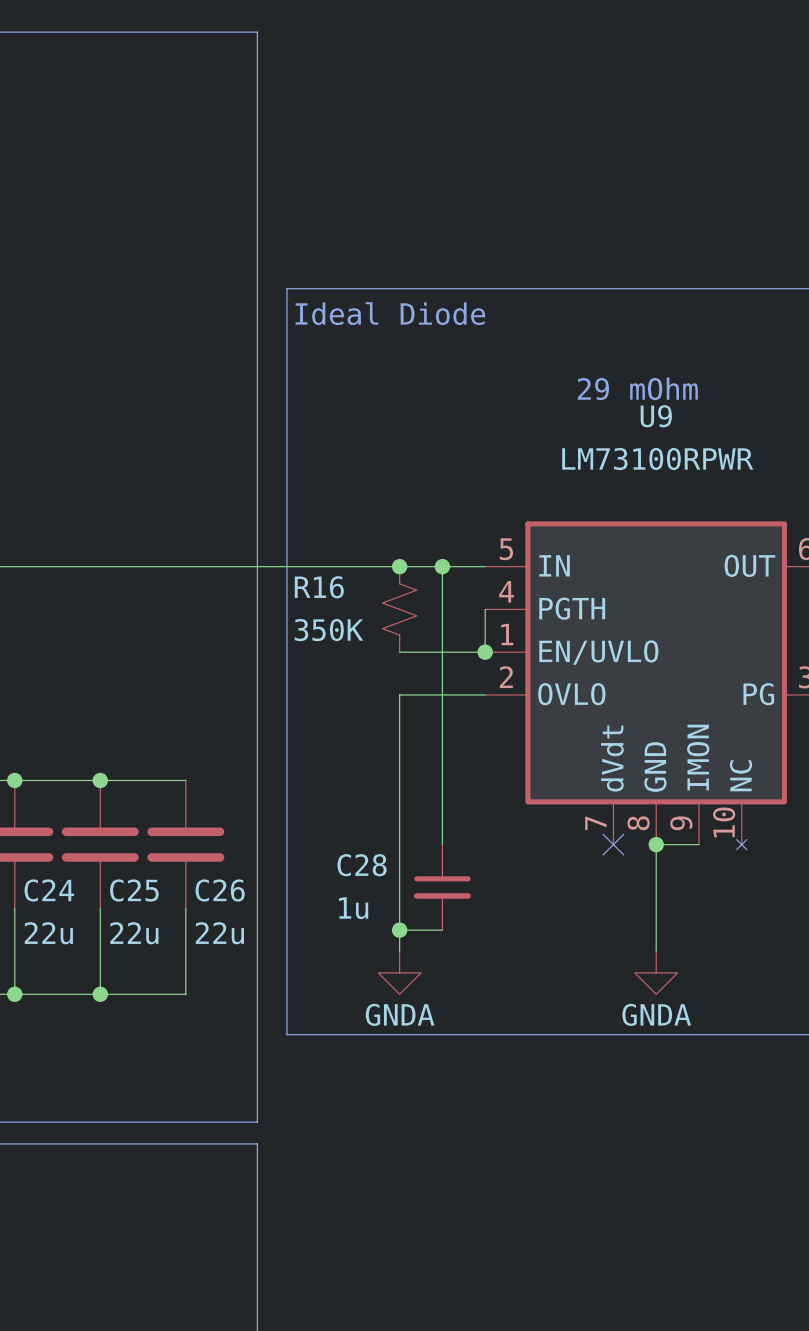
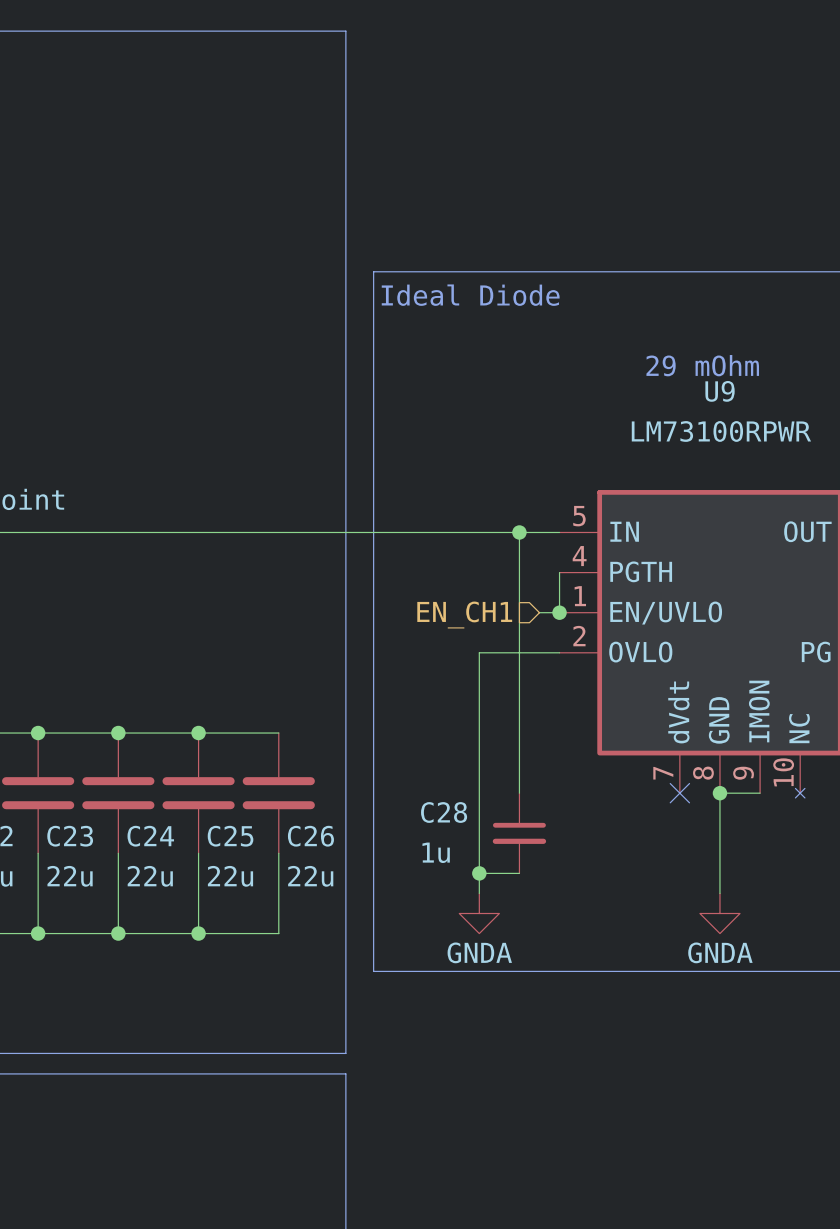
junction: (399, 566) -> none
R16: 350K (399, 609) -> none
wire: (399, 652) (463, 652) -> none
hierarchical label: none -> EN_CH1 (464, 615)

